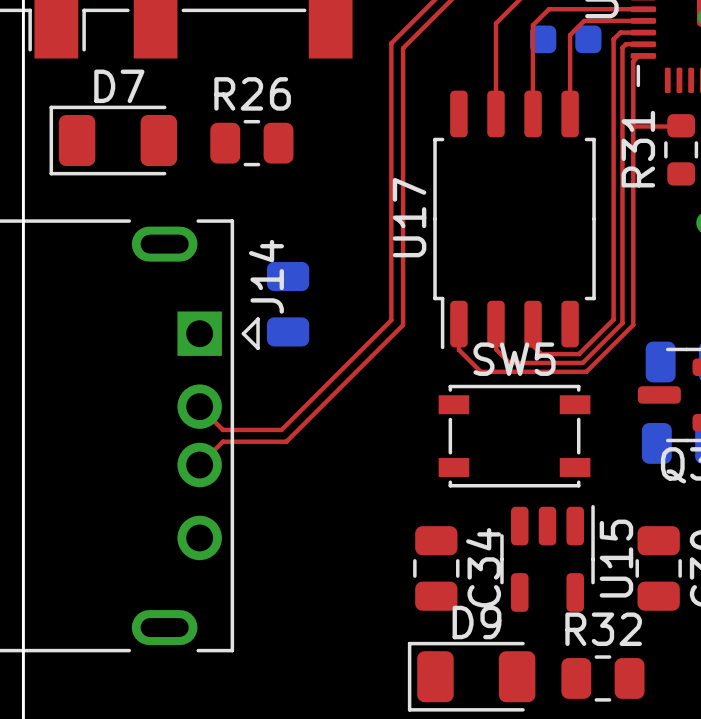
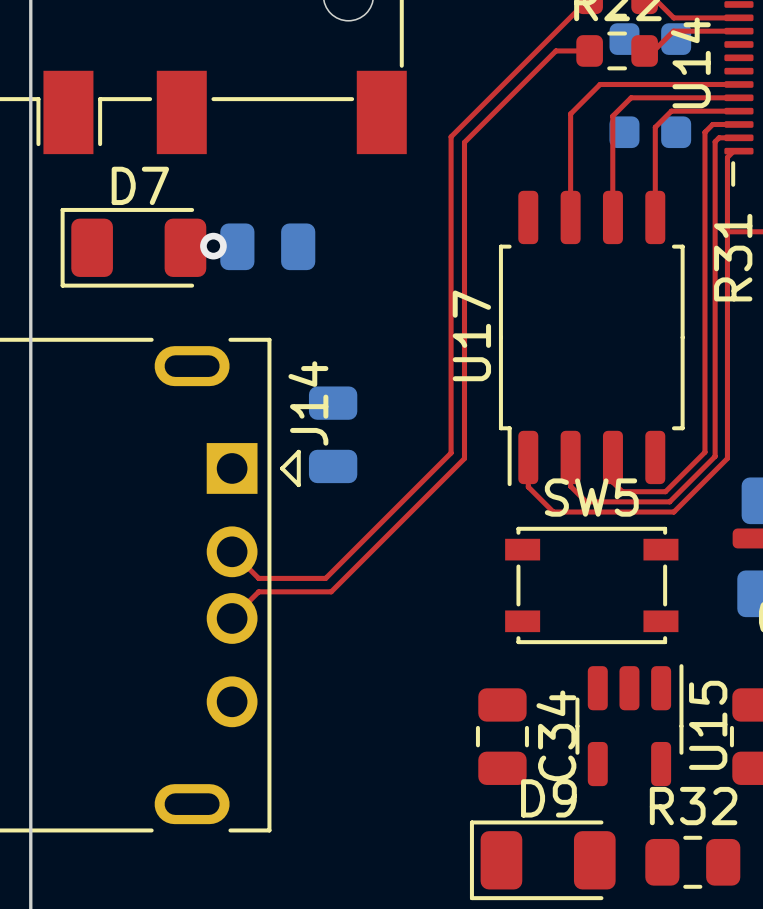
via: none -> (213, 246)
R26 side: top (251, 143) -> bottom (267, 246)

